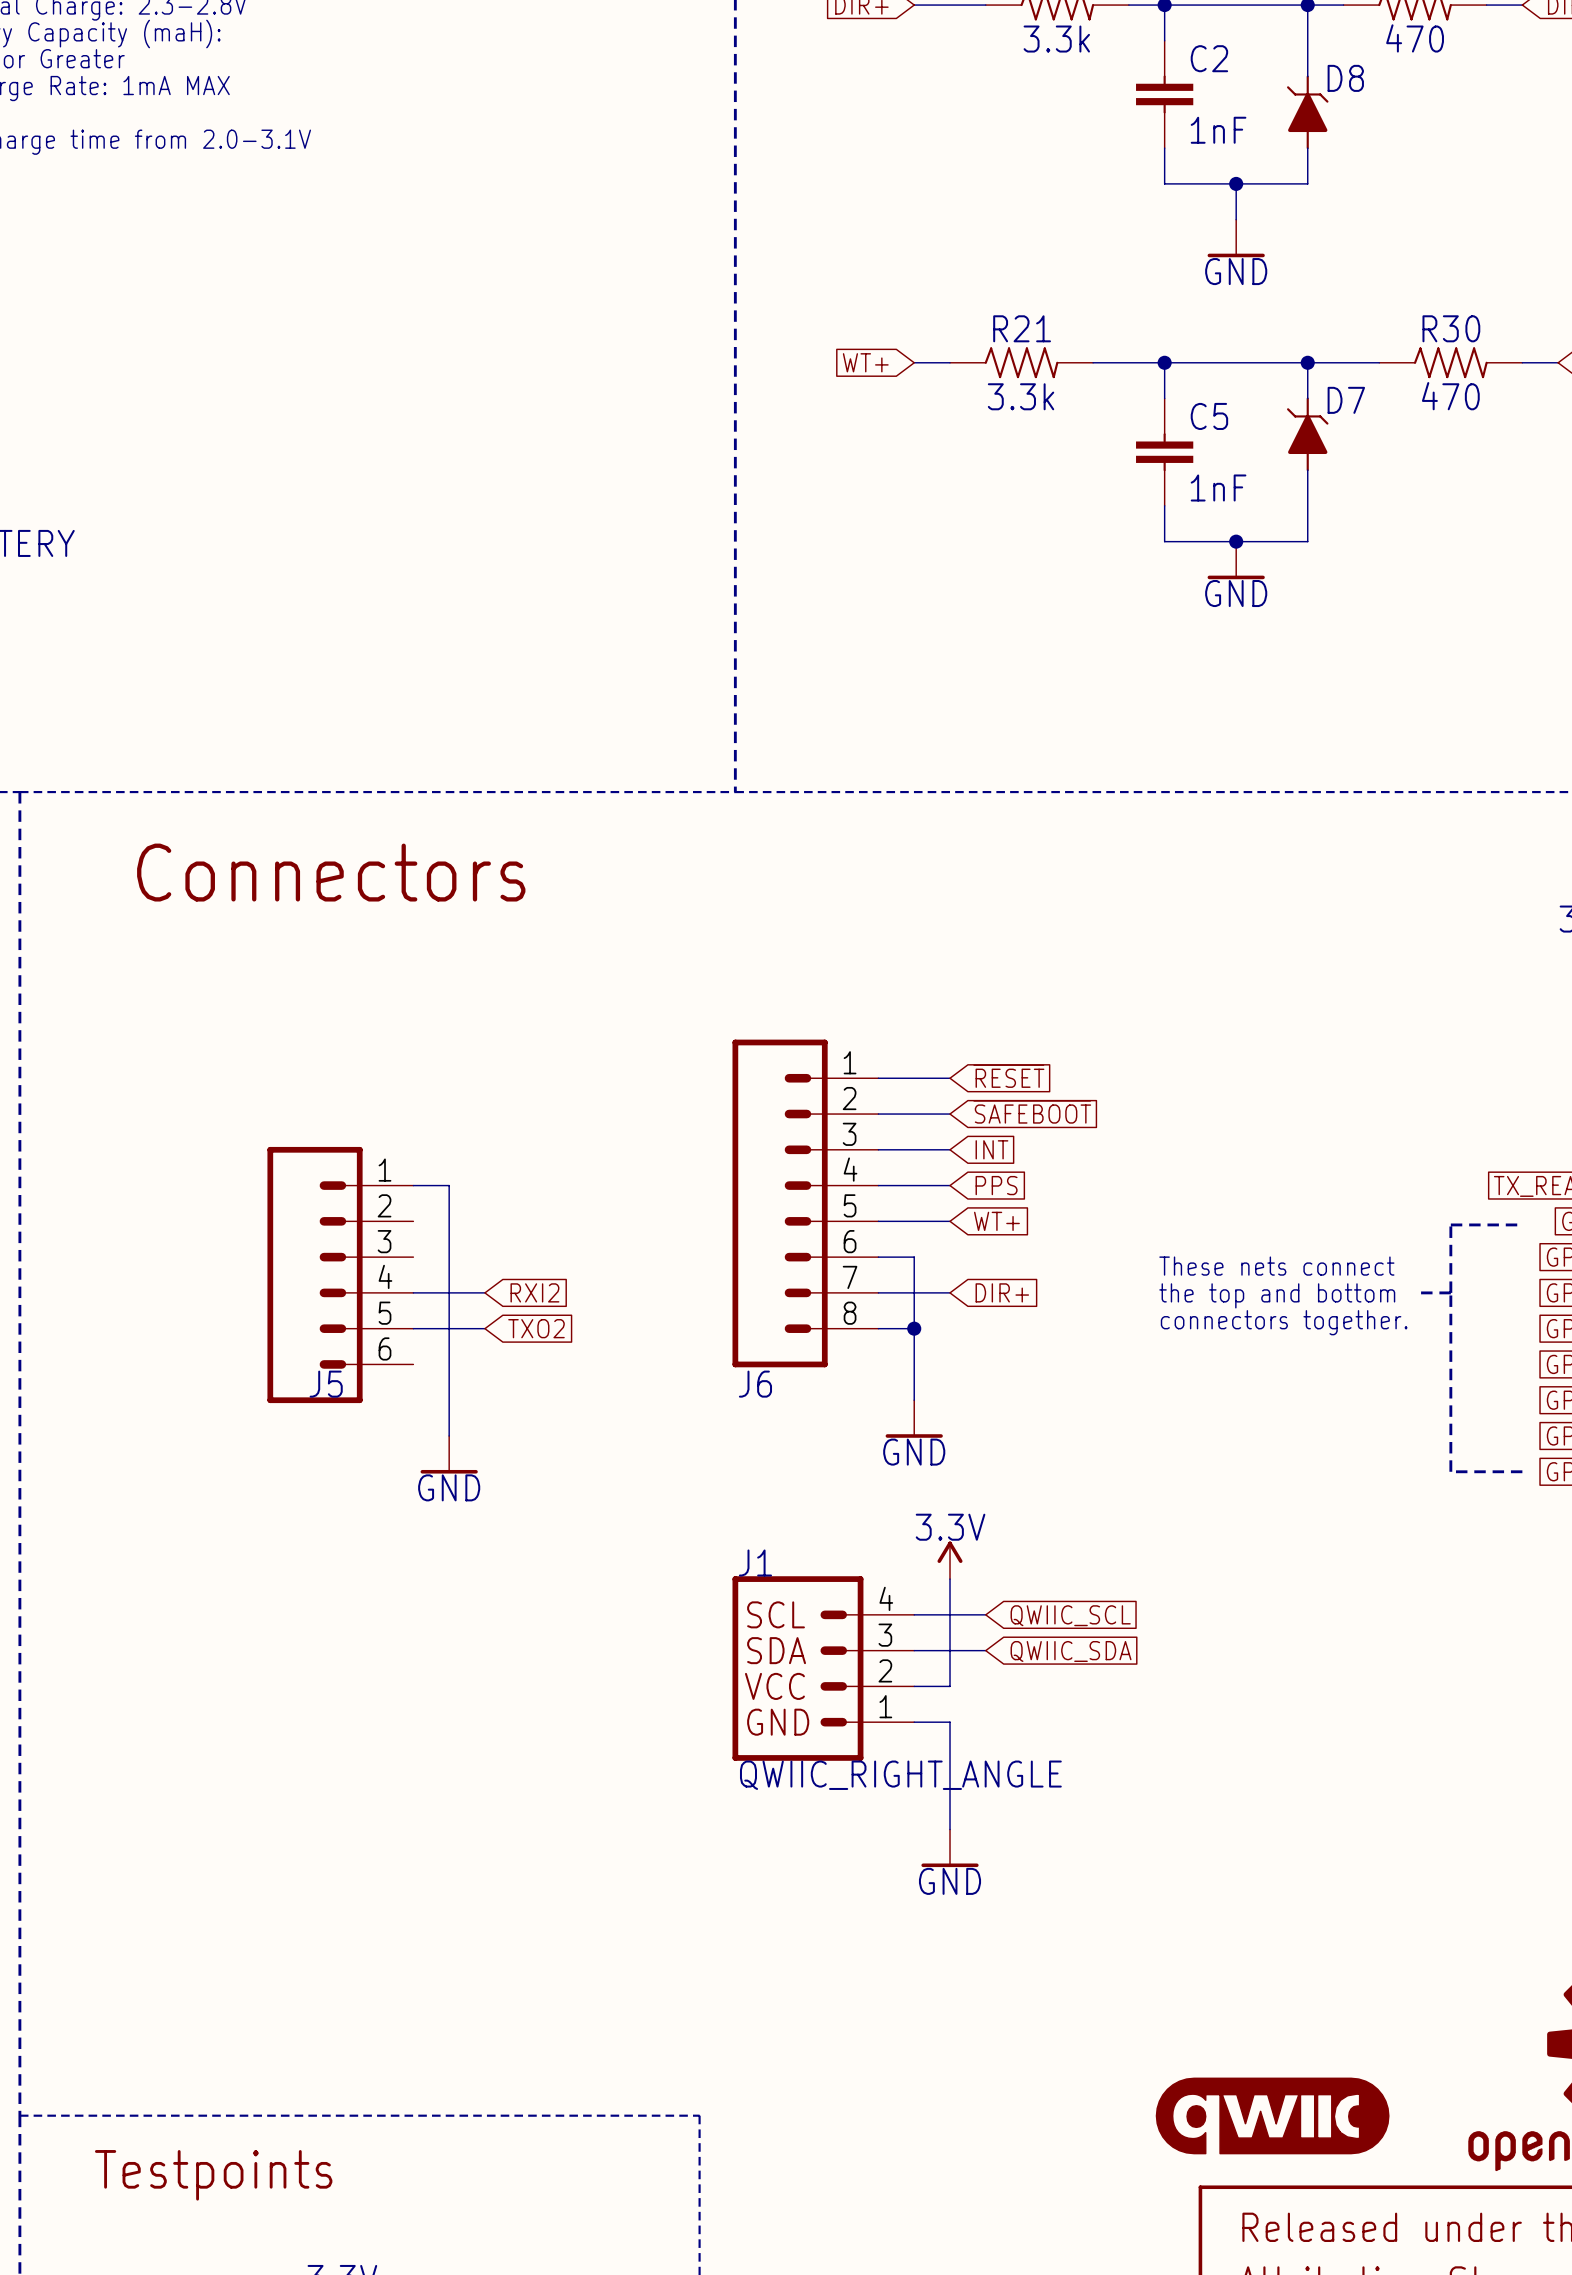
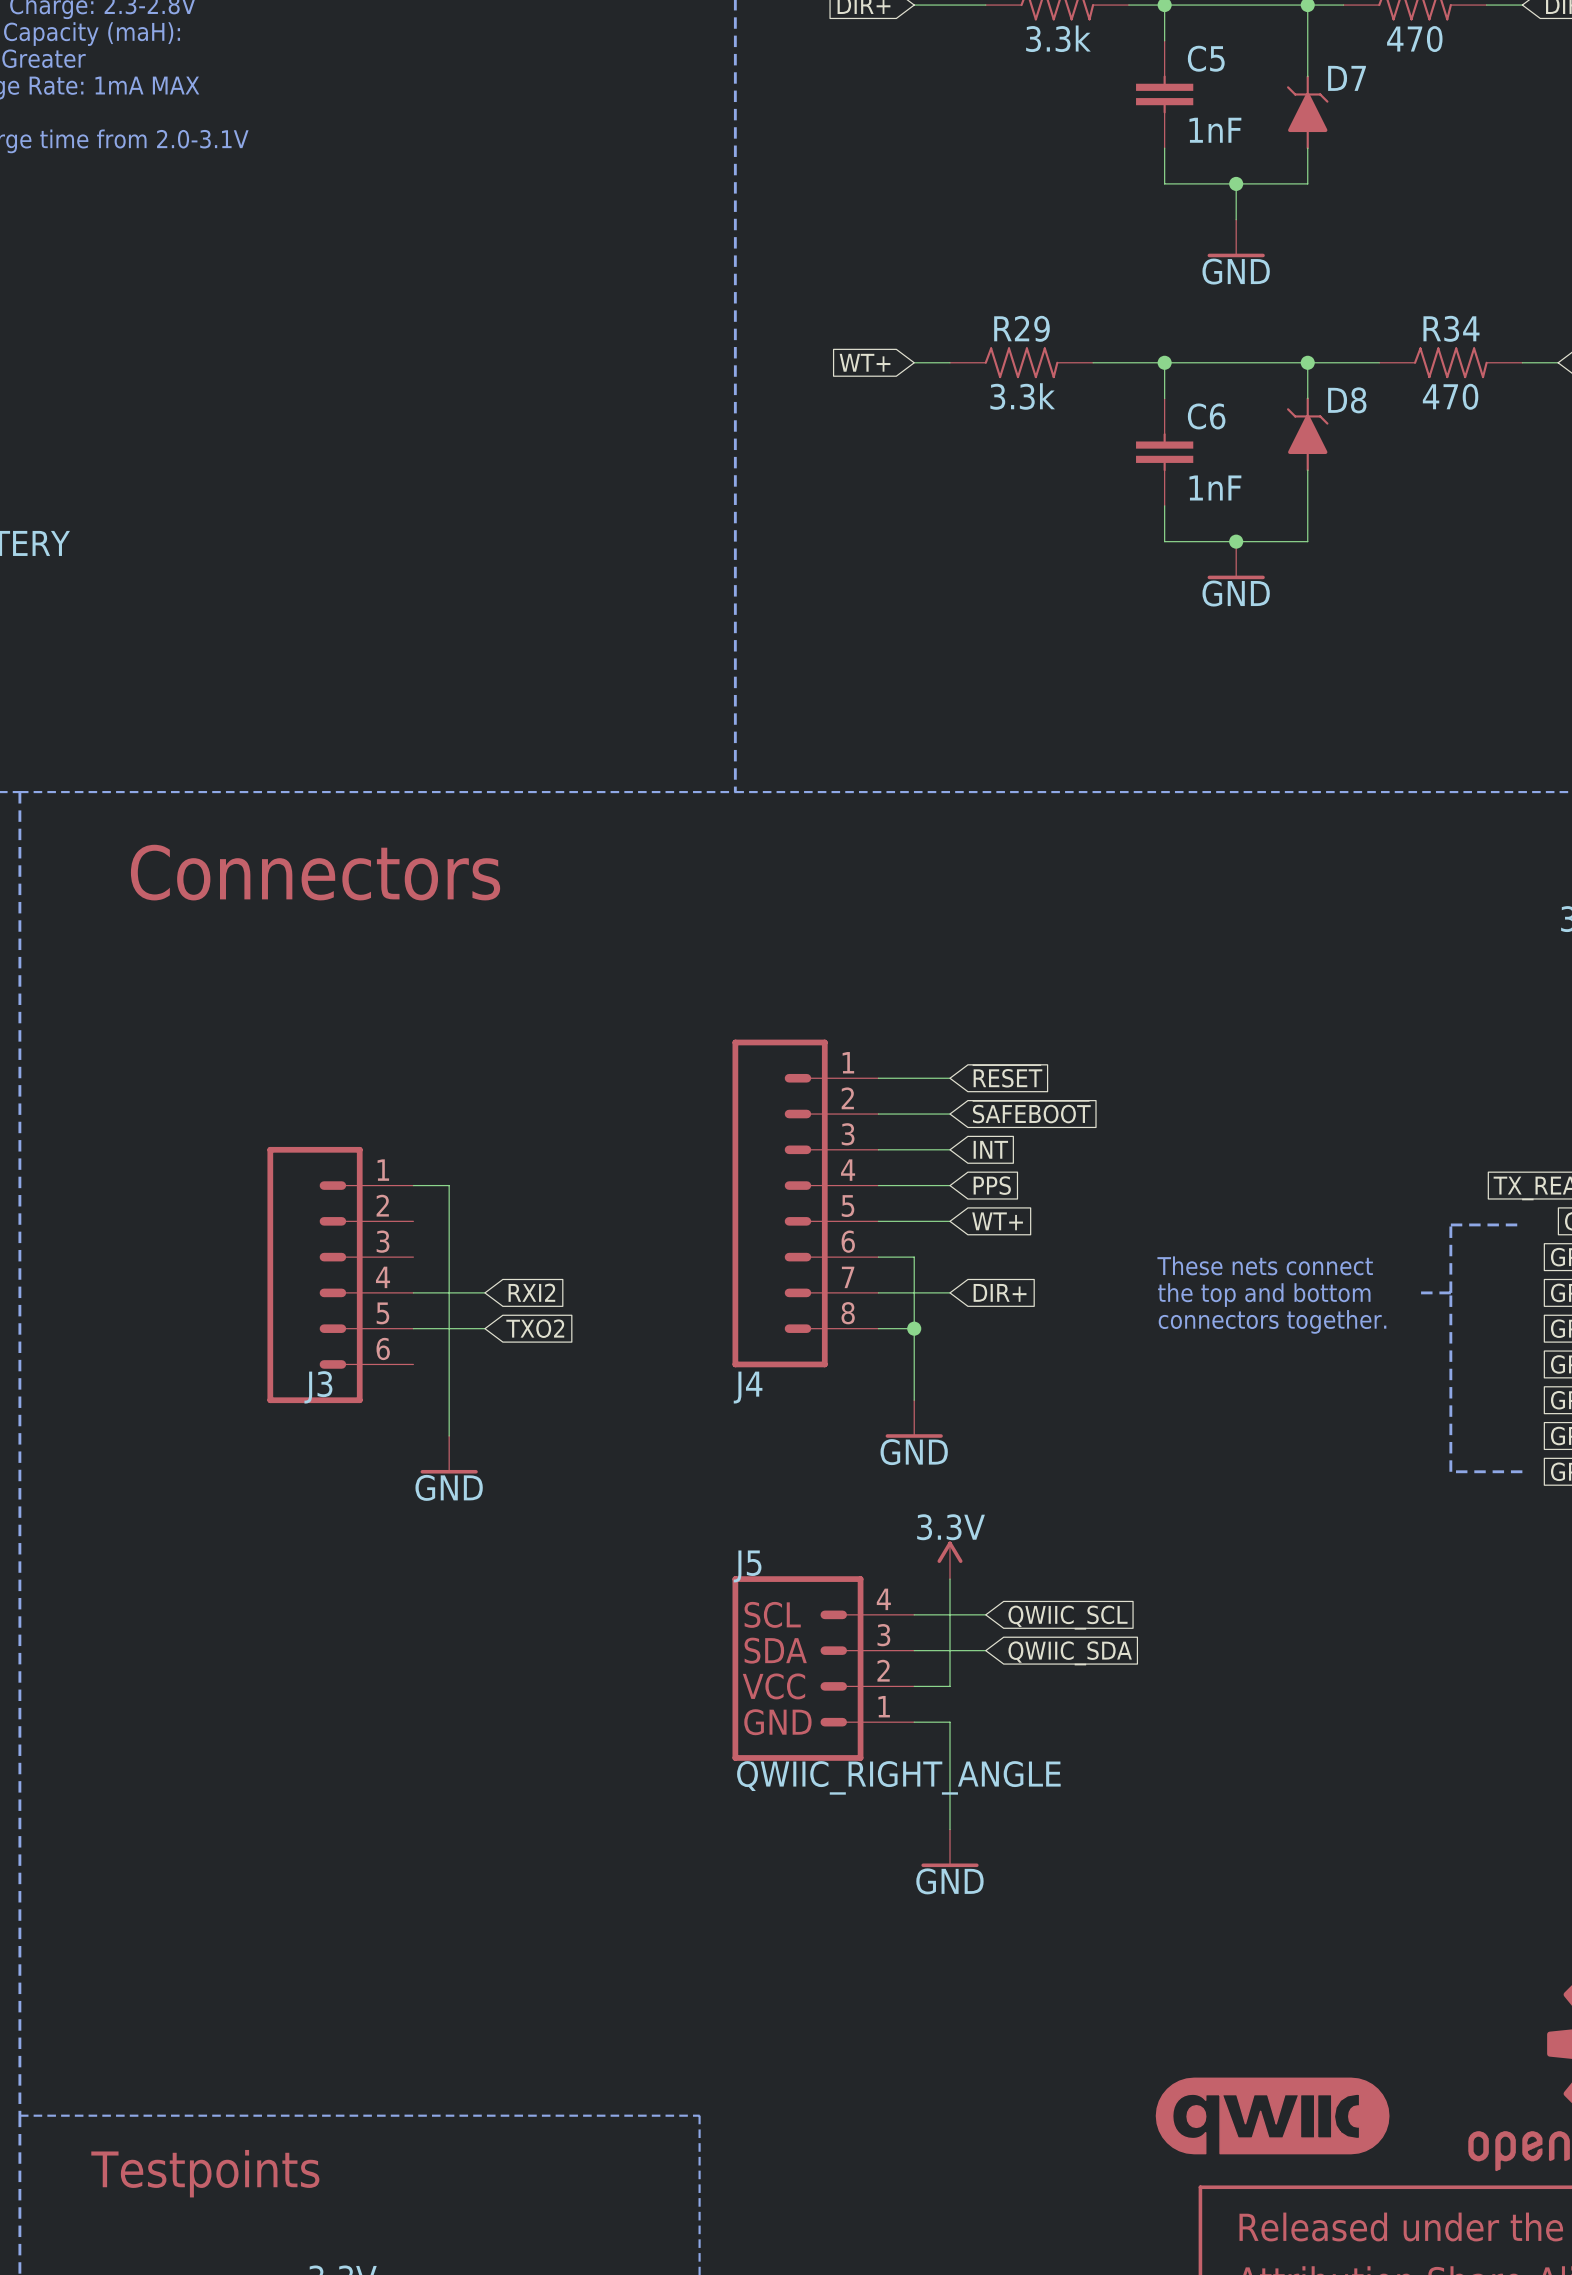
C2 name: C2 (1209, 58) -> C5 (1206, 58)
D8 name: D8 (1345, 78) -> D7 (1347, 78)
R21 name: R21 (1022, 328) -> R29 (1021, 328)
R30 name: R30 (1451, 328) -> R34 (1451, 328)
D7 name: D7 (1346, 400) -> D8 (1347, 400)
C5 name: C5 (1209, 416) -> C6 (1206, 416)
J5 name: J5 (326, 1384) -> J3 (318, 1387)
J6 name: J6 (755, 1384) -> J4 (748, 1387)
J1 name: J1 (755, 1562) -> J5 (747, 1566)

